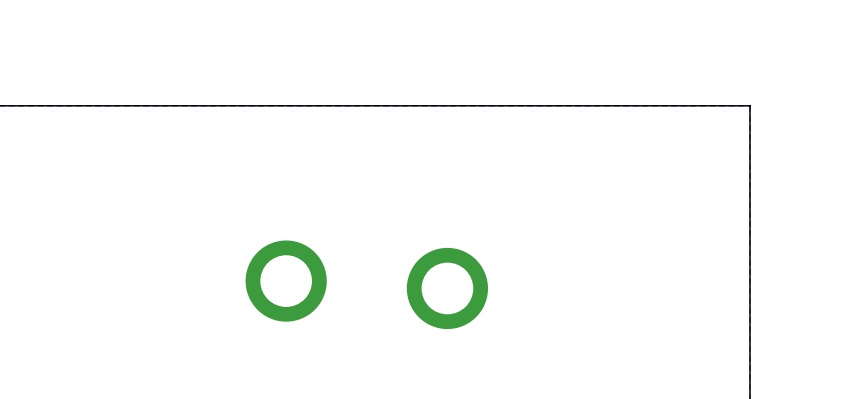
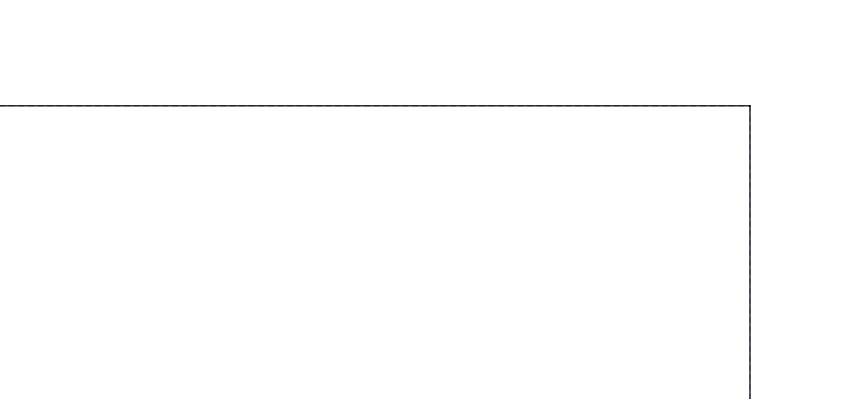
part: (286, 281) -> none
part: (447, 288) -> none

